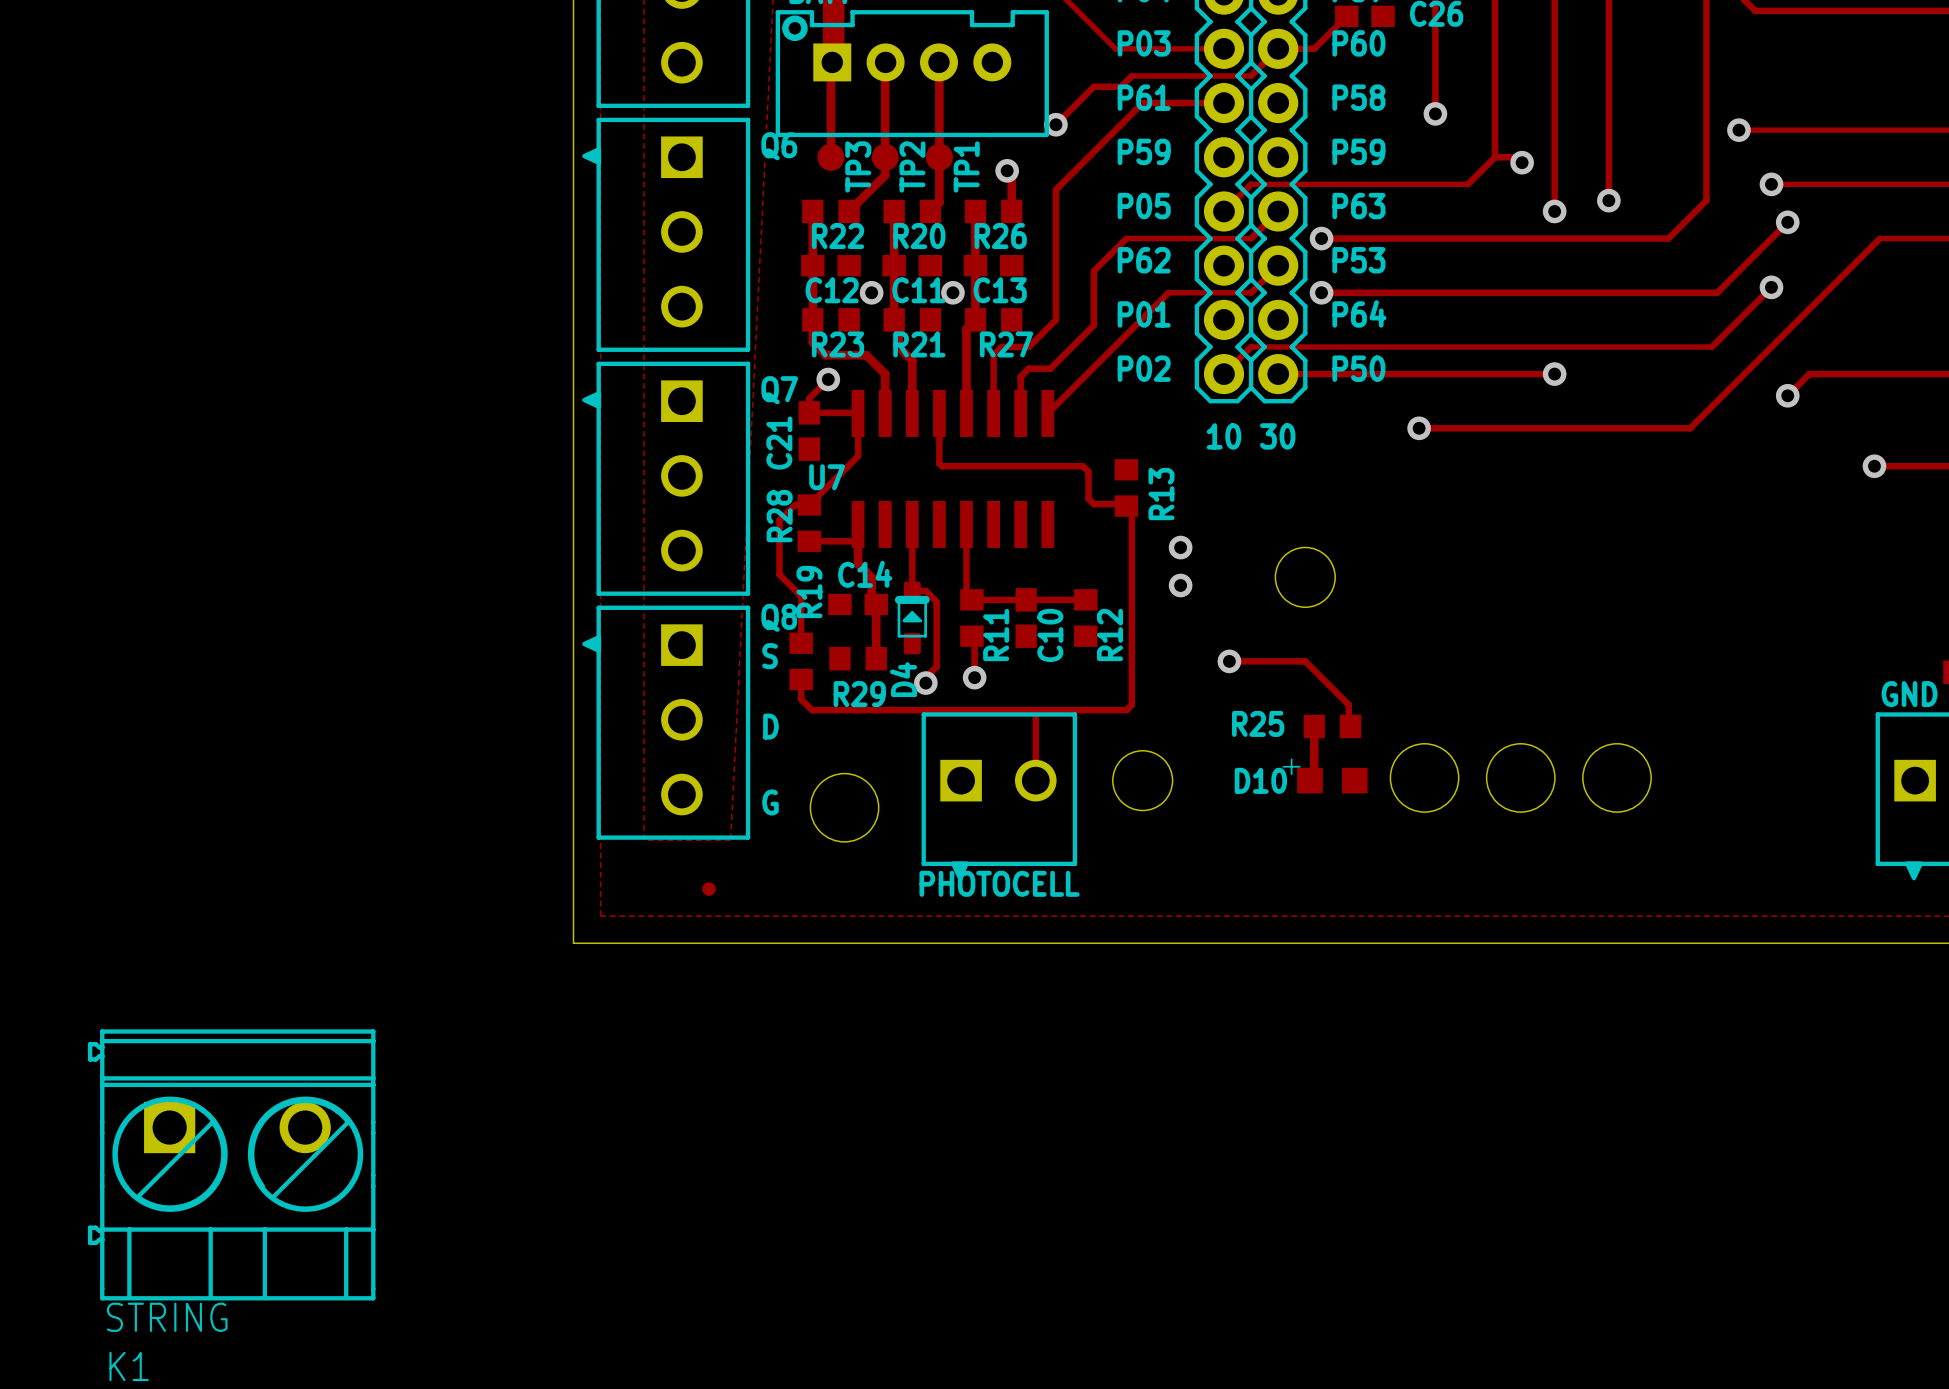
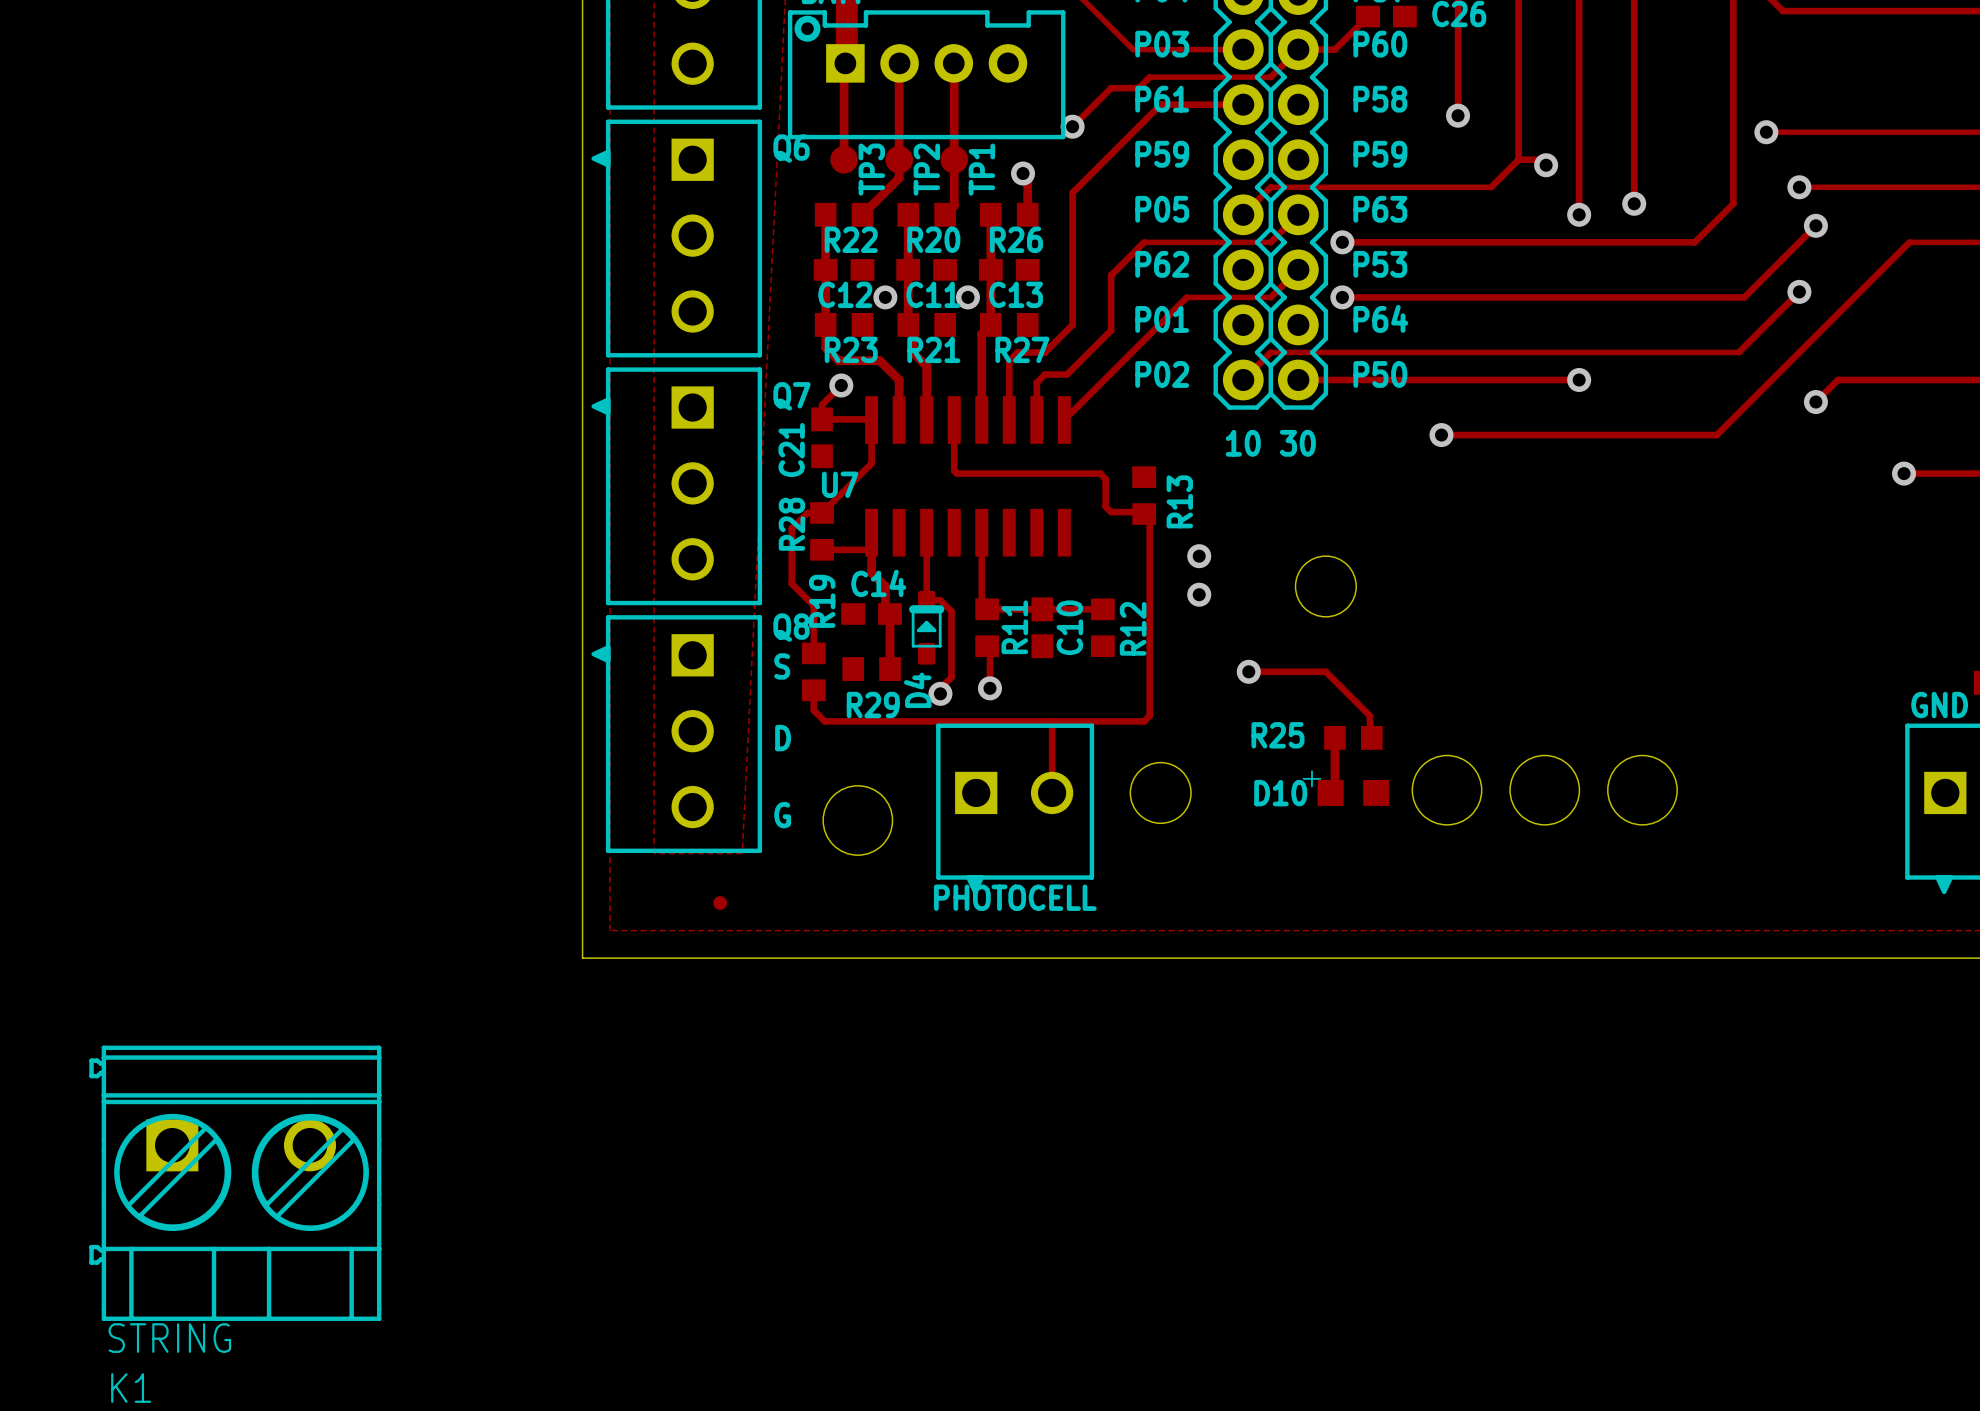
R11 name position: R11 (996, 635) -> R11 (1014, 627)
C10 name position: C10 (1050, 635) -> C10 (1069, 627)
R12 name position: R12 (1109, 635) -> R12 (1133, 628)
STRING footprint: [87, 1029, 376, 1301] -> [89, 1045, 382, 1321]

